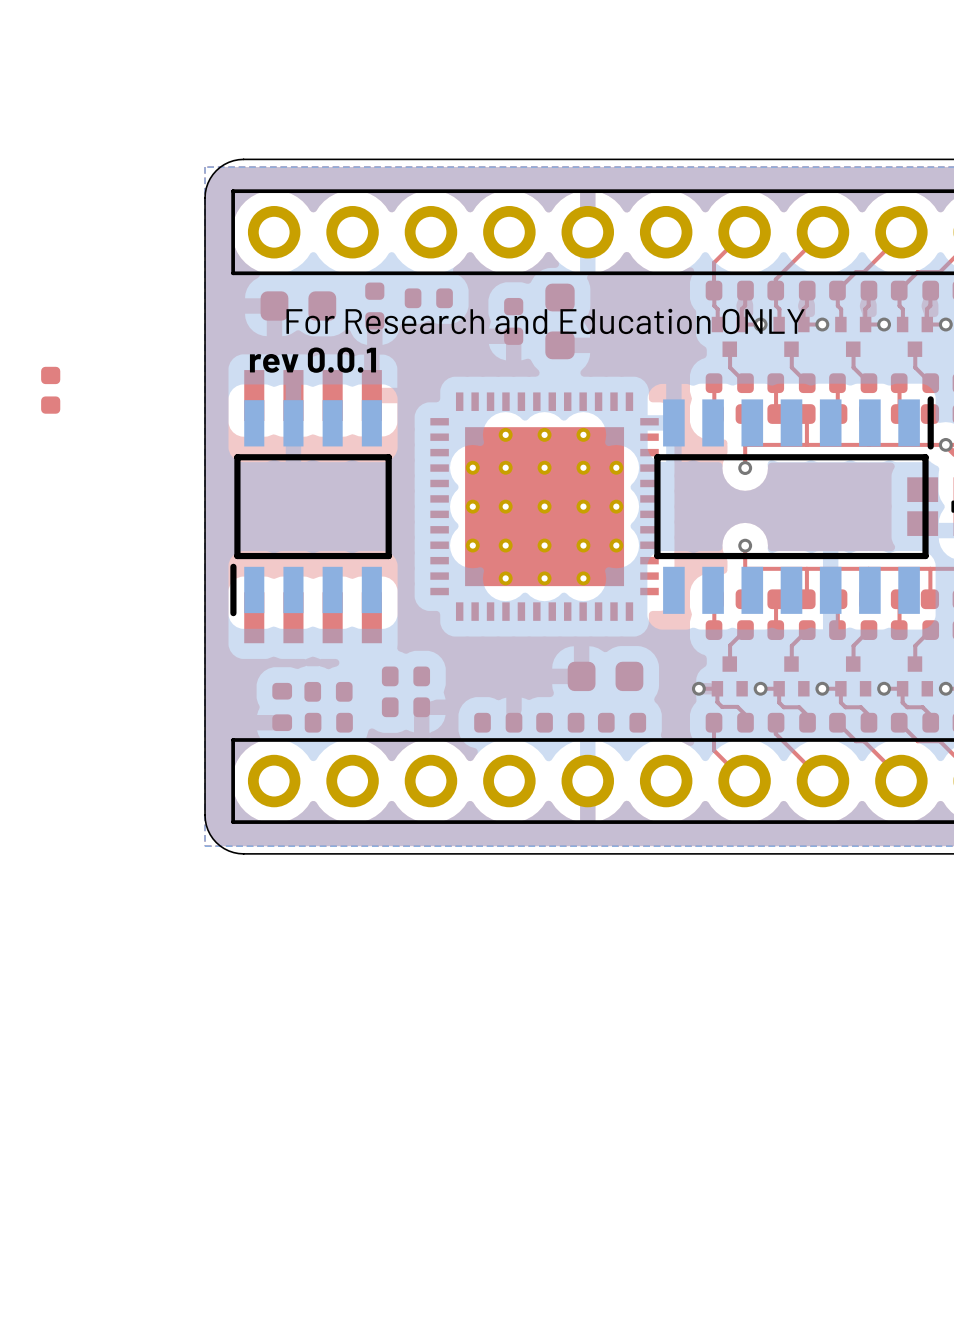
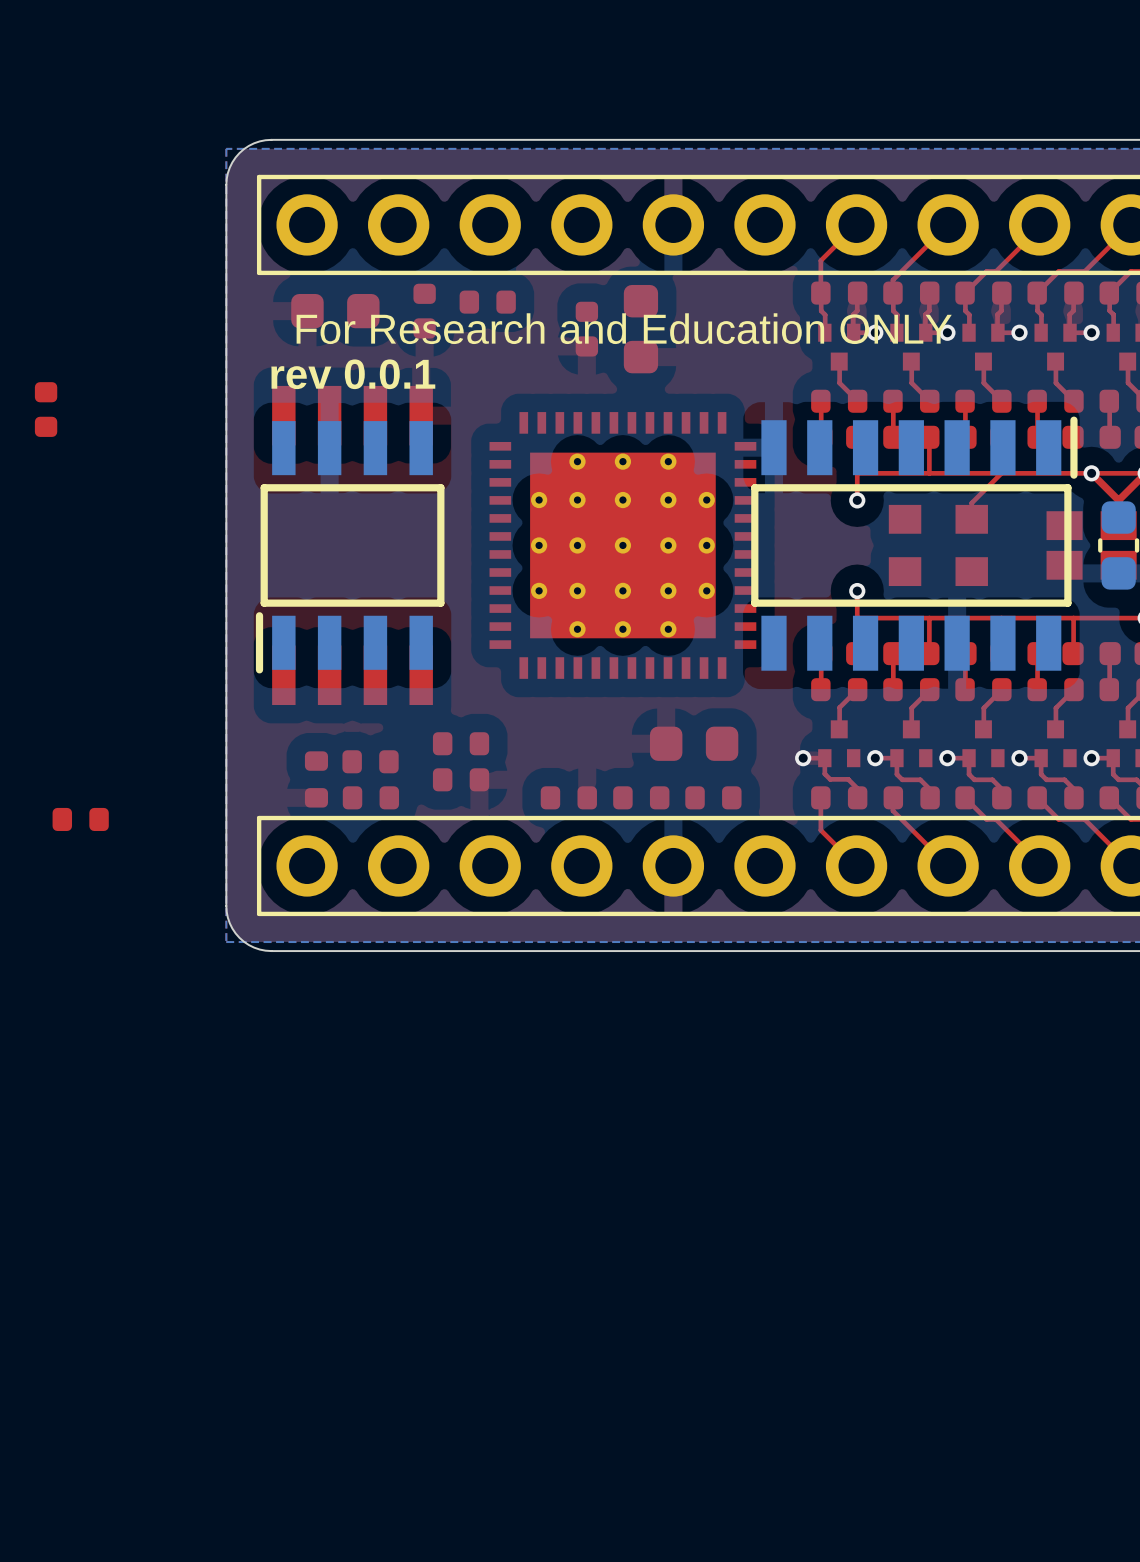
top track: none -> (1001, 473) (971, 503) (971, 519)
part: none -> (938, 545)
part: none -> (80, 819)

